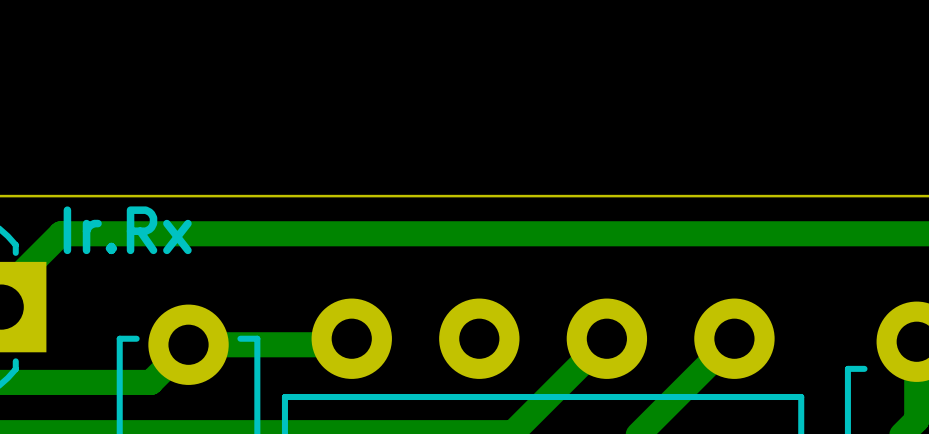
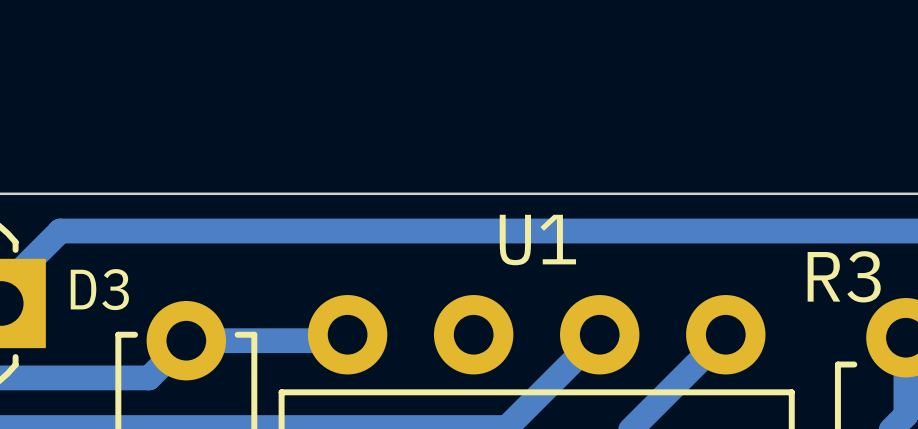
D3 value: Ir.Rx (127, 230) -> none
U1 name: none -> U1 (537, 240)
R3 name: none -> R3 (844, 276)
D3 name: none -> D3 (99, 289)

